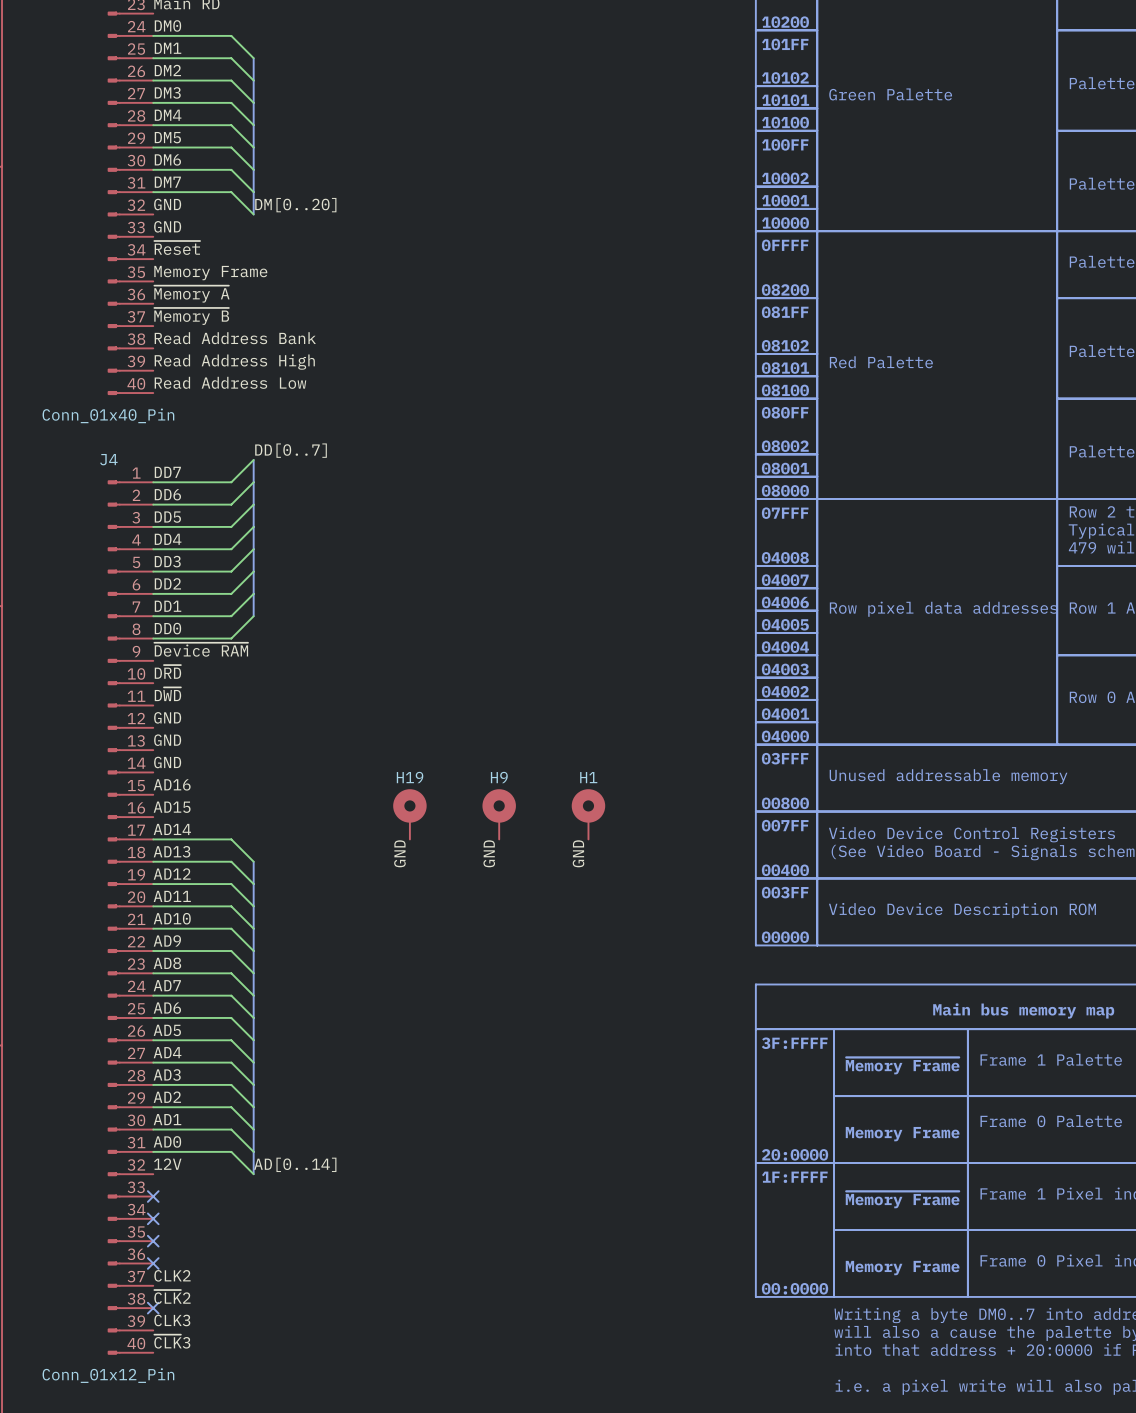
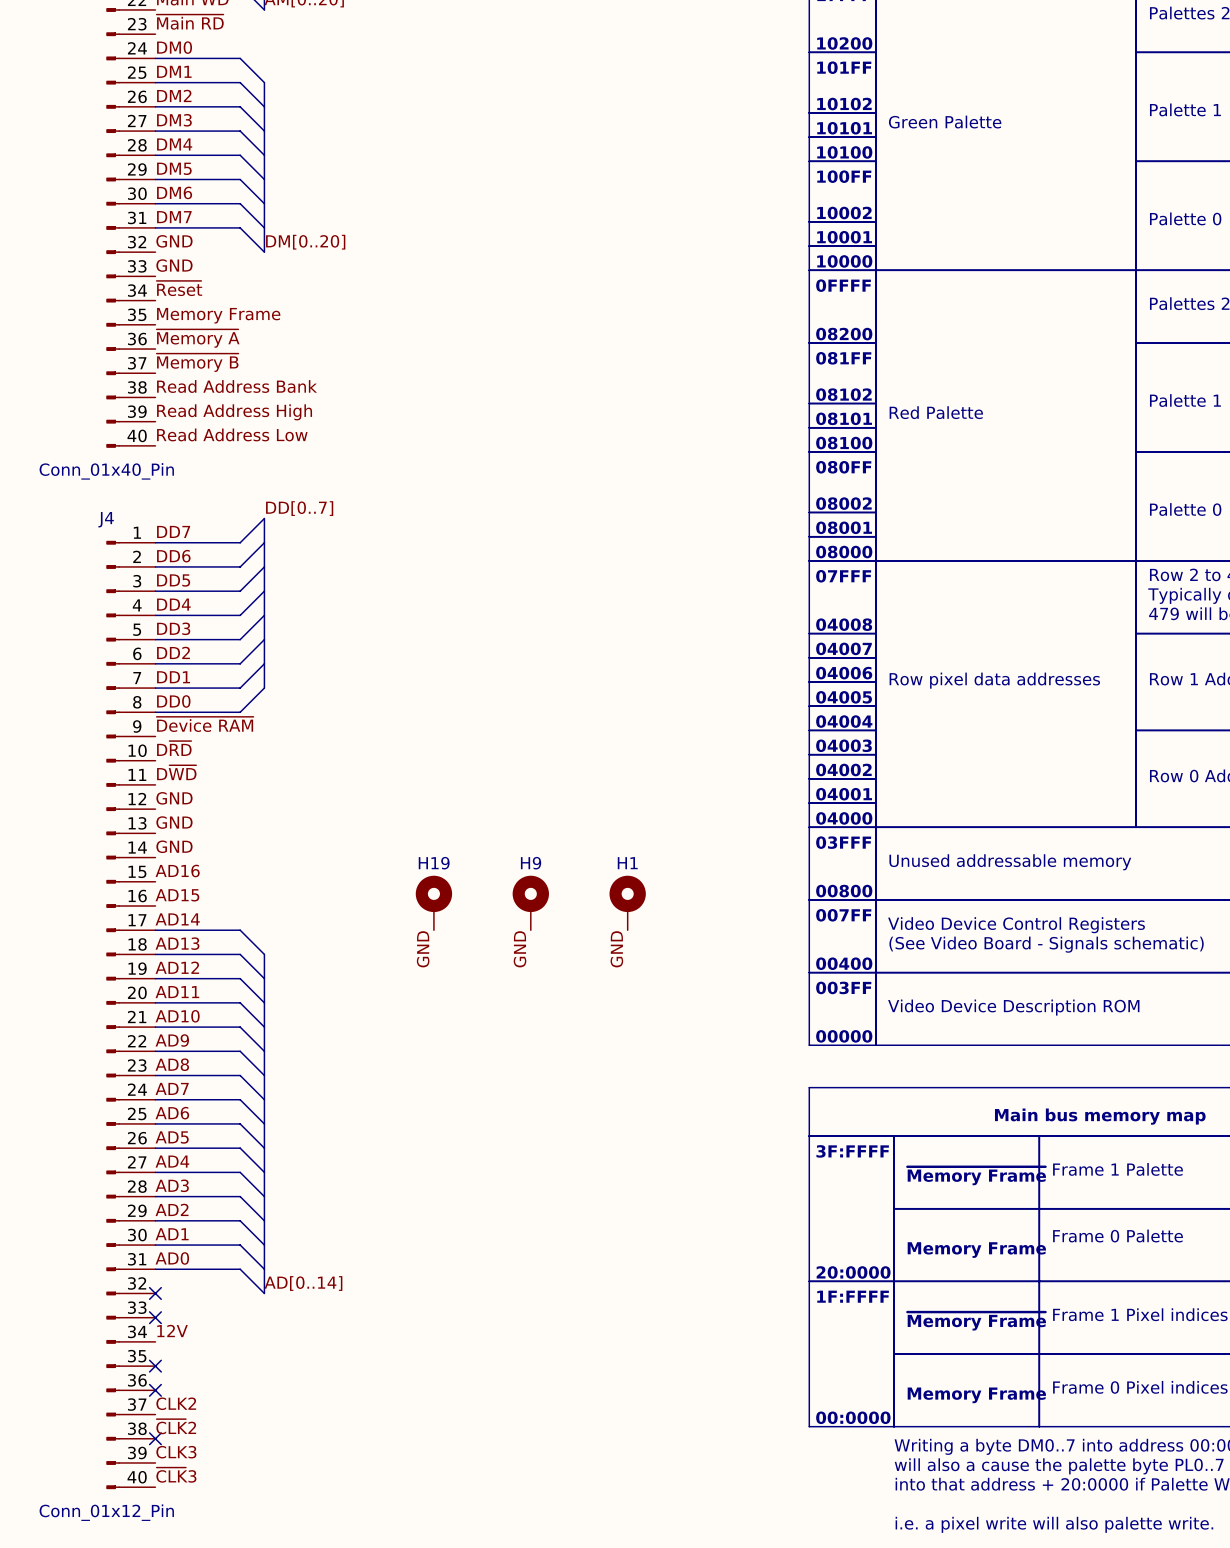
label position: 12V (167, 1164) -> 12V (172, 1330)
no-connect mark position: (153, 1218) -> (155, 1293)

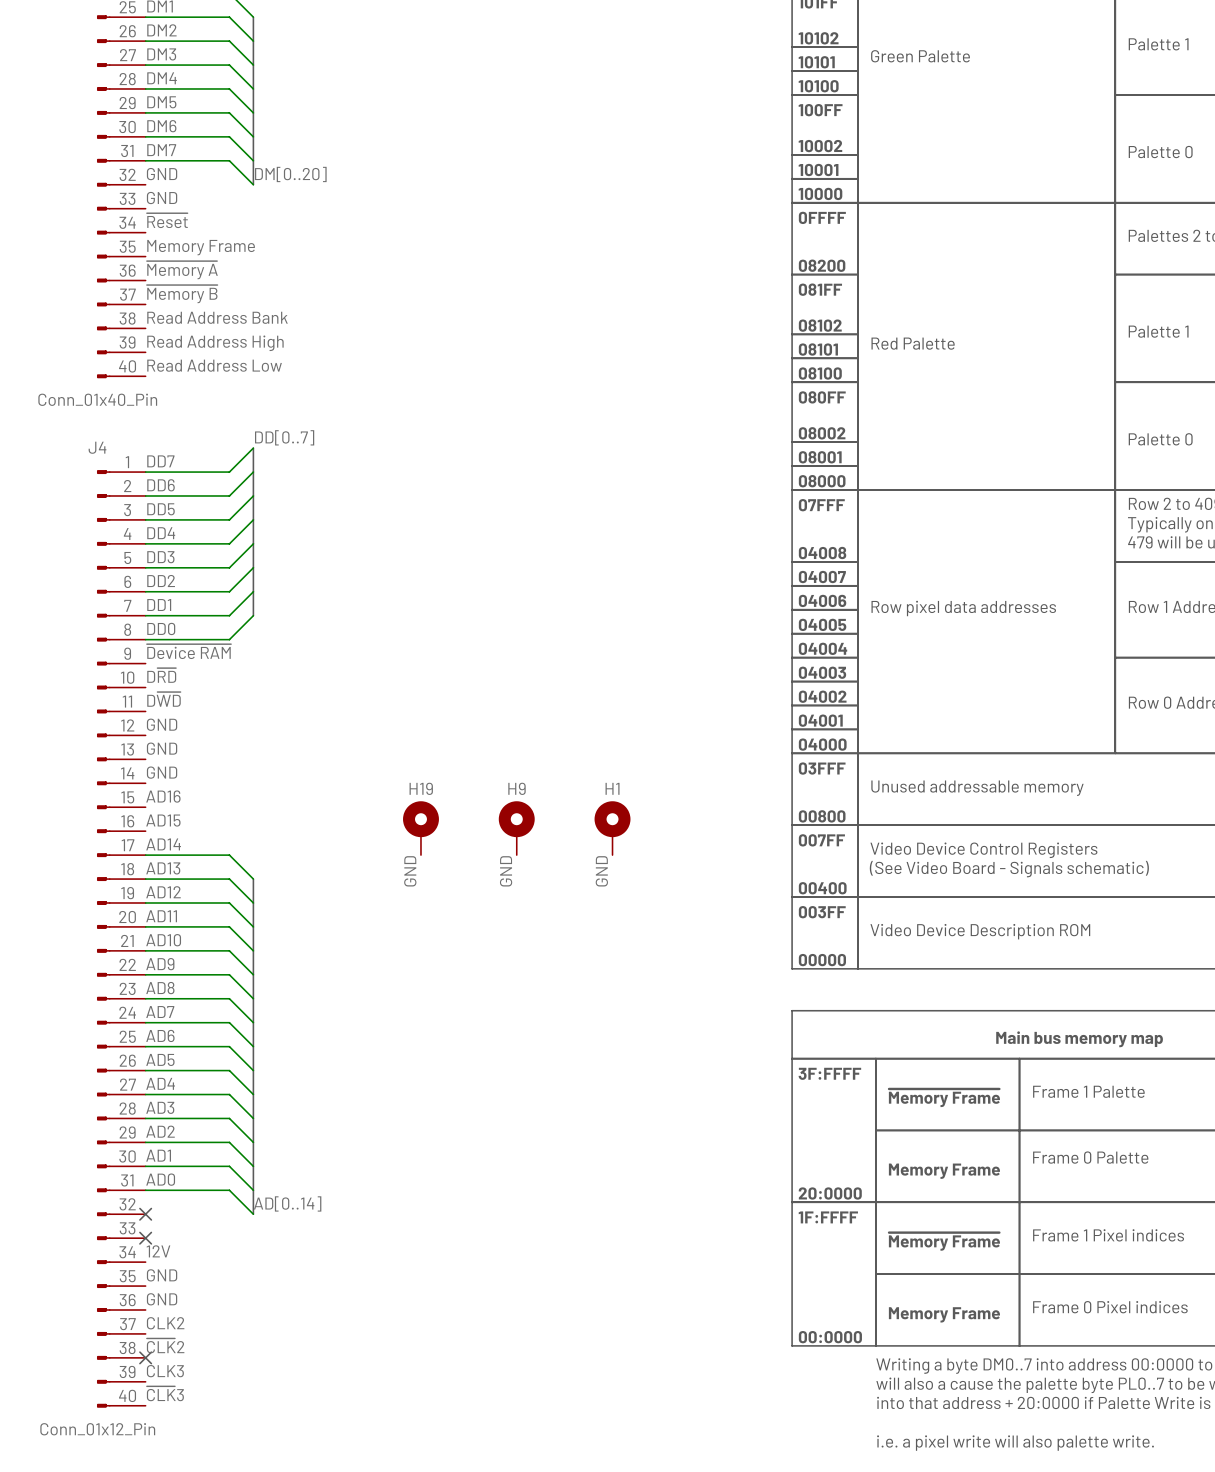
label: none -> GND (162, 1275)
no-connect mark: (155, 1366) -> none
label: none -> GND (162, 1299)
no-connect mark: (155, 1390) -> none

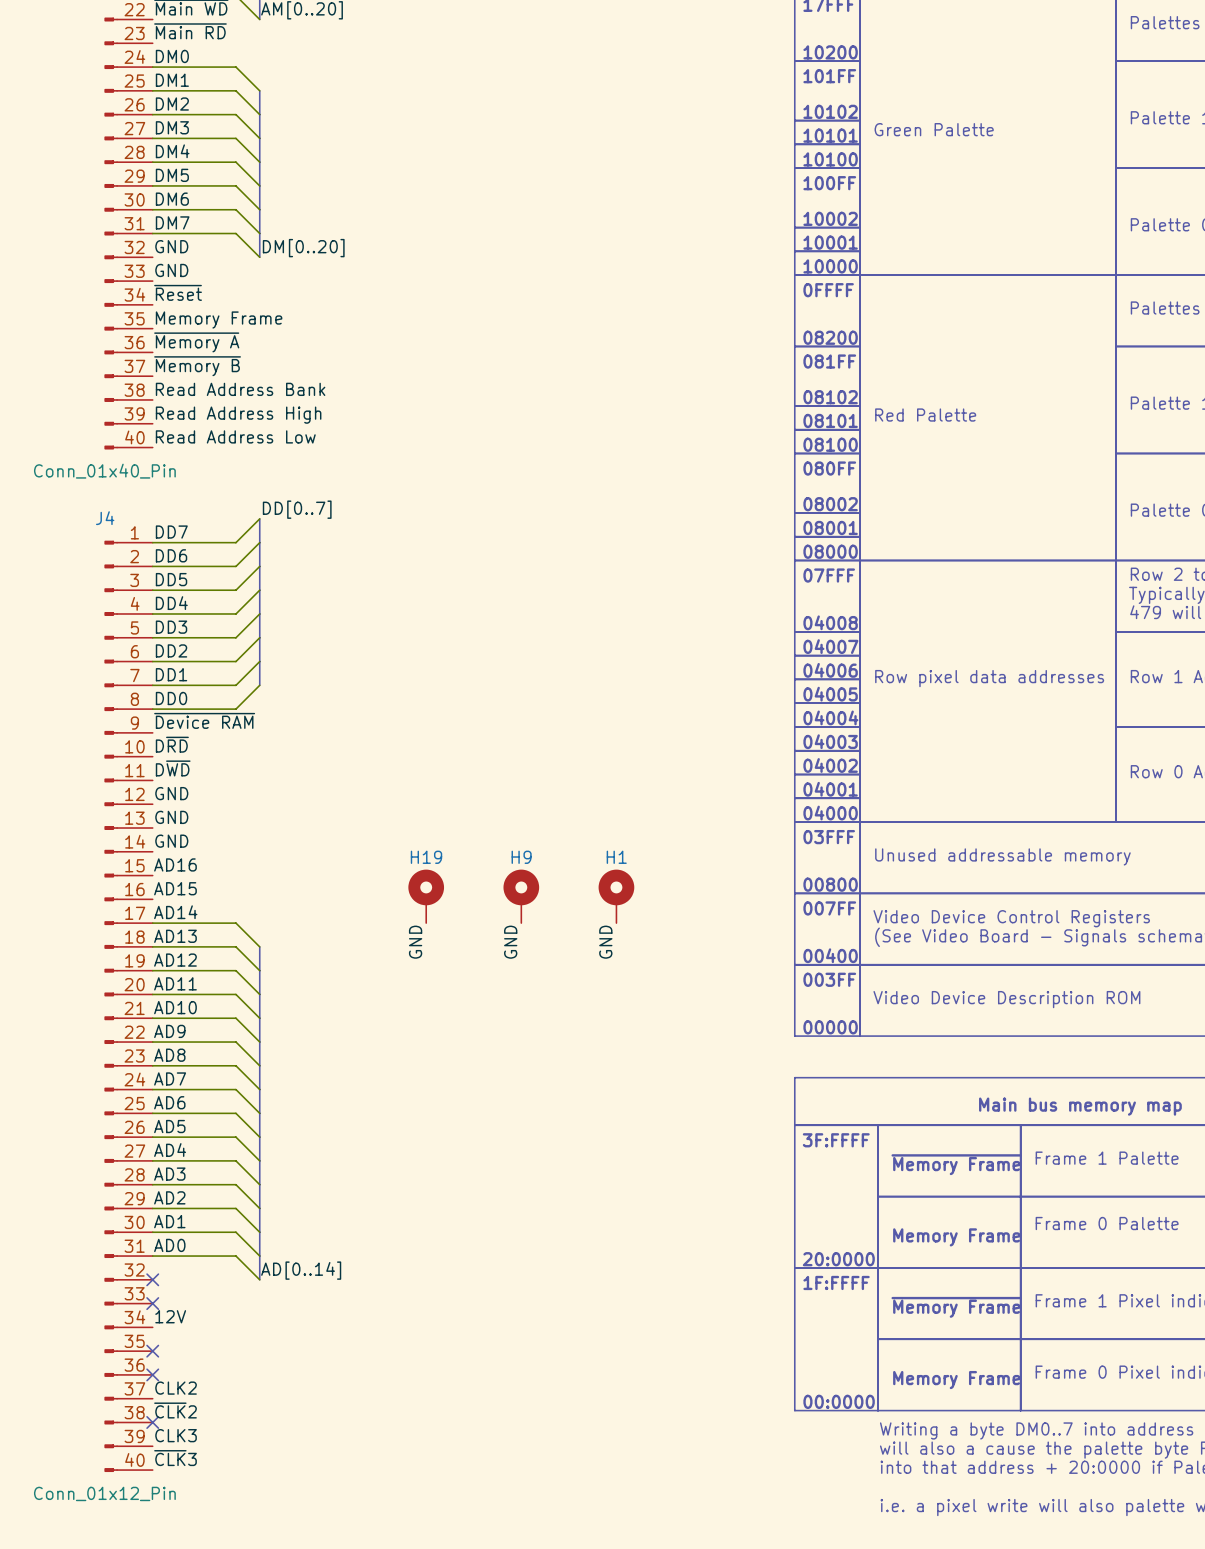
label: GND (162, 1275) -> none
no-connect mark: none -> (152, 1351)
label: GND (162, 1299) -> none
no-connect mark: none -> (152, 1374)

